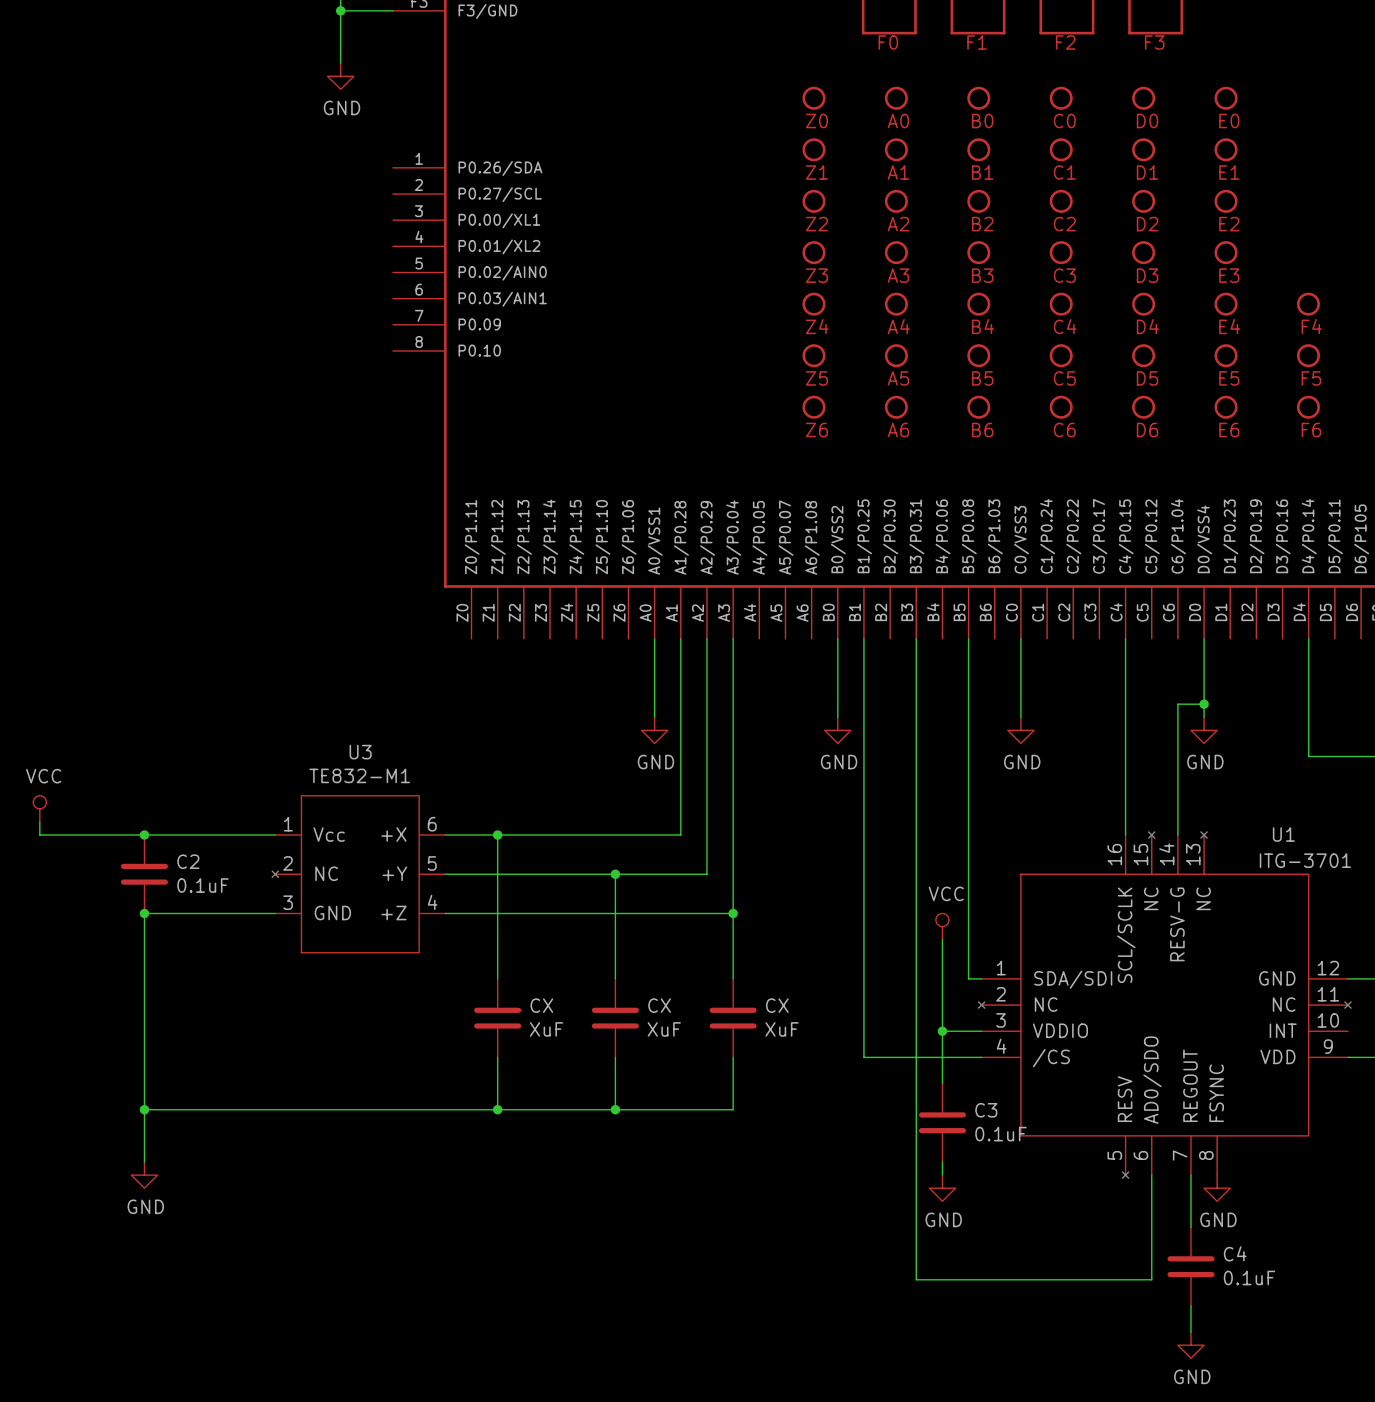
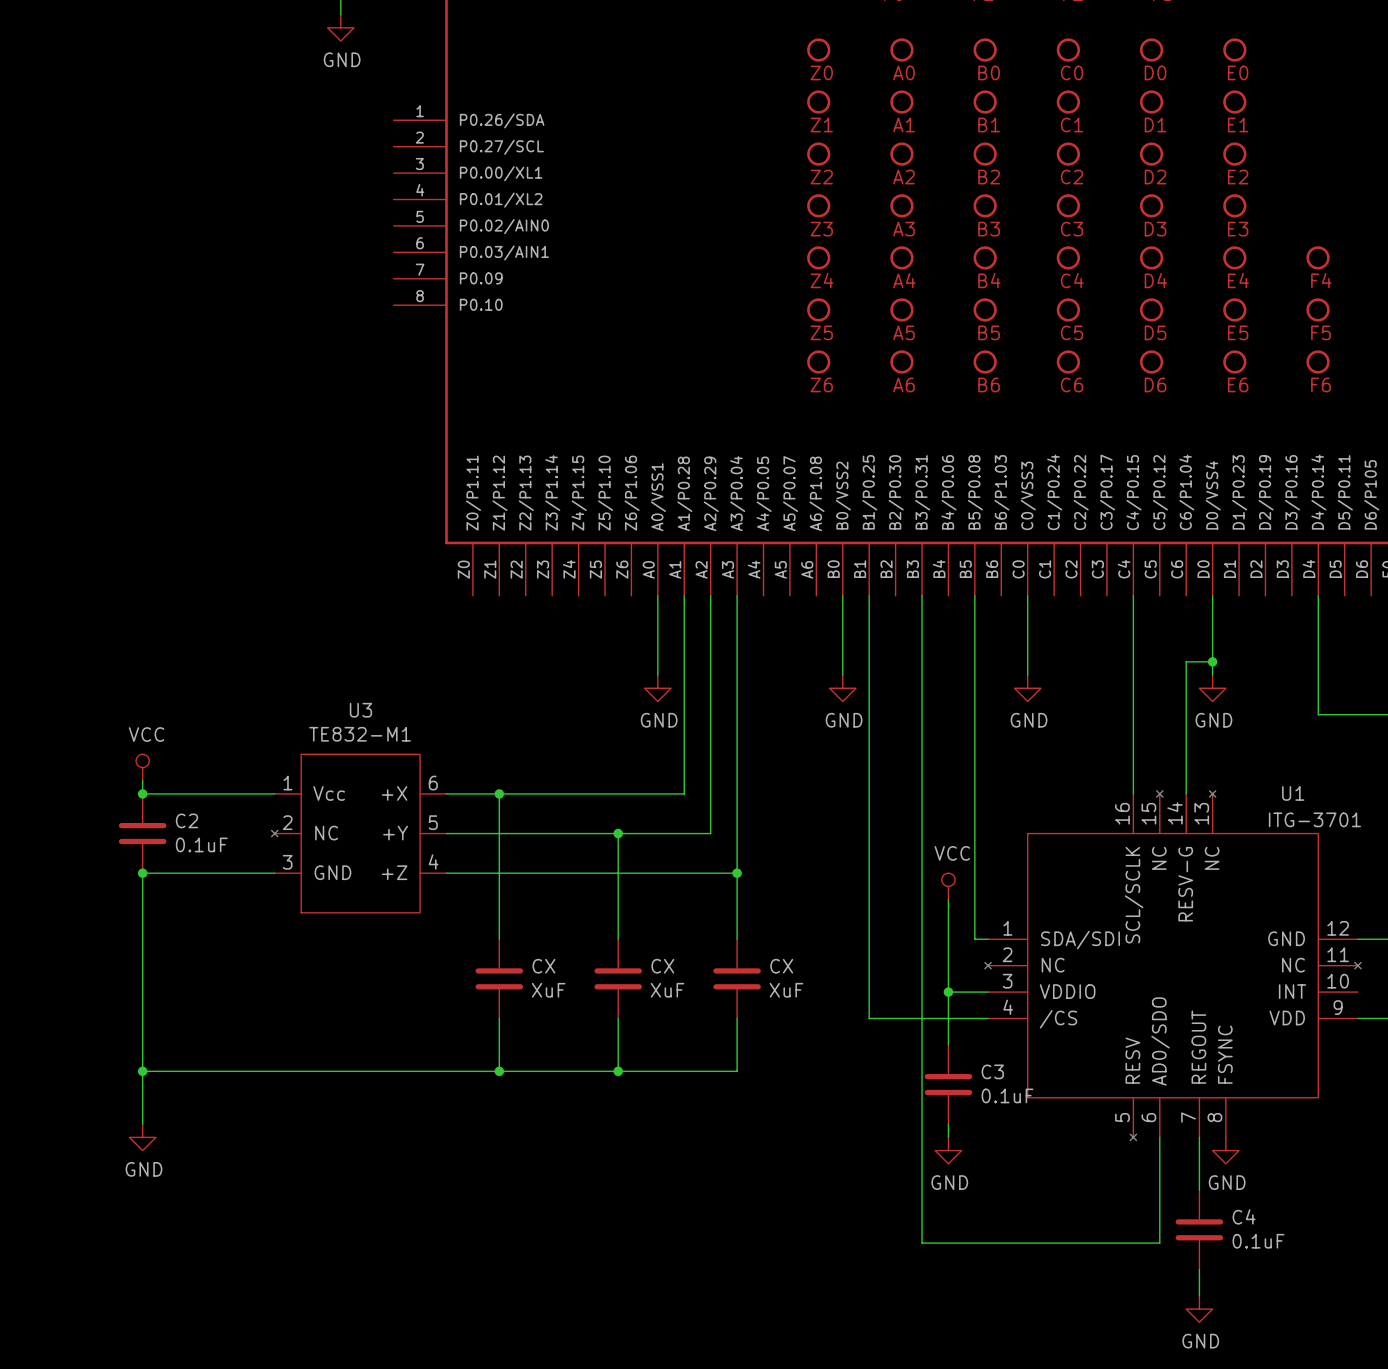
power symbol position: VCC (39, 808) -> VCC (142, 767)
wire: (39, 821) (39, 835) (144, 835) -> (142, 780) (142, 793)

